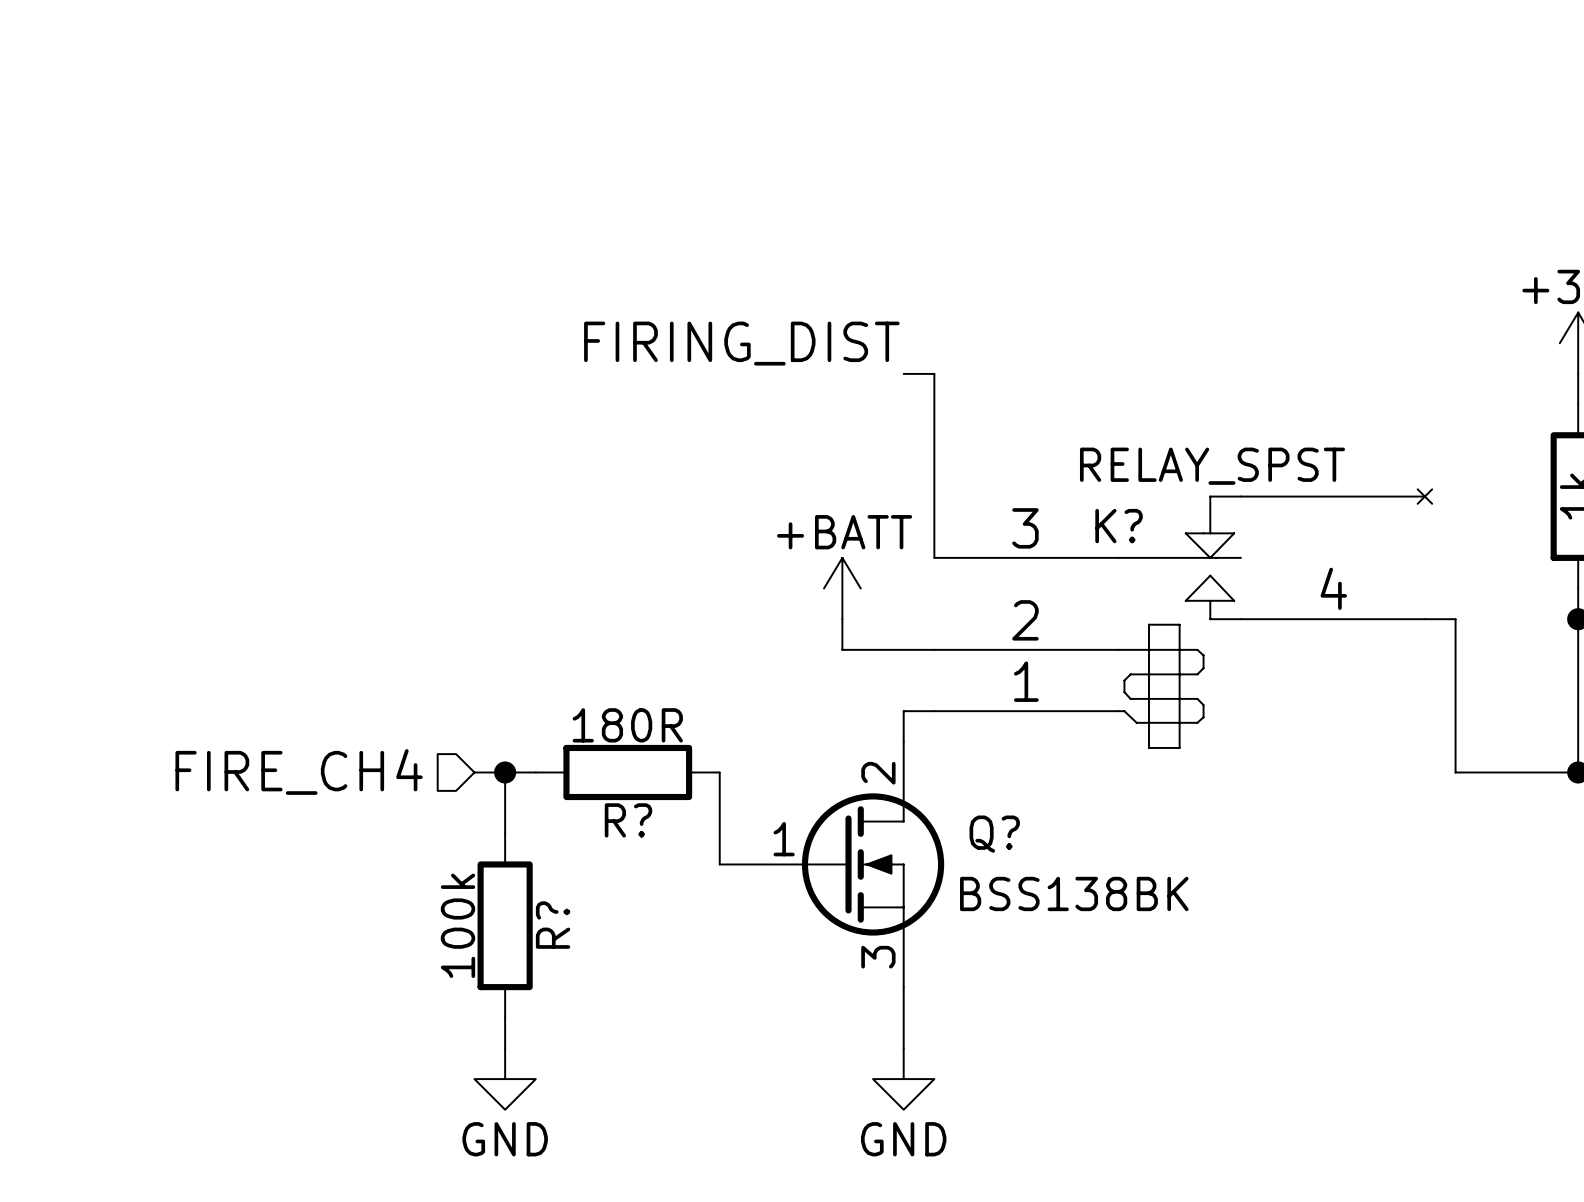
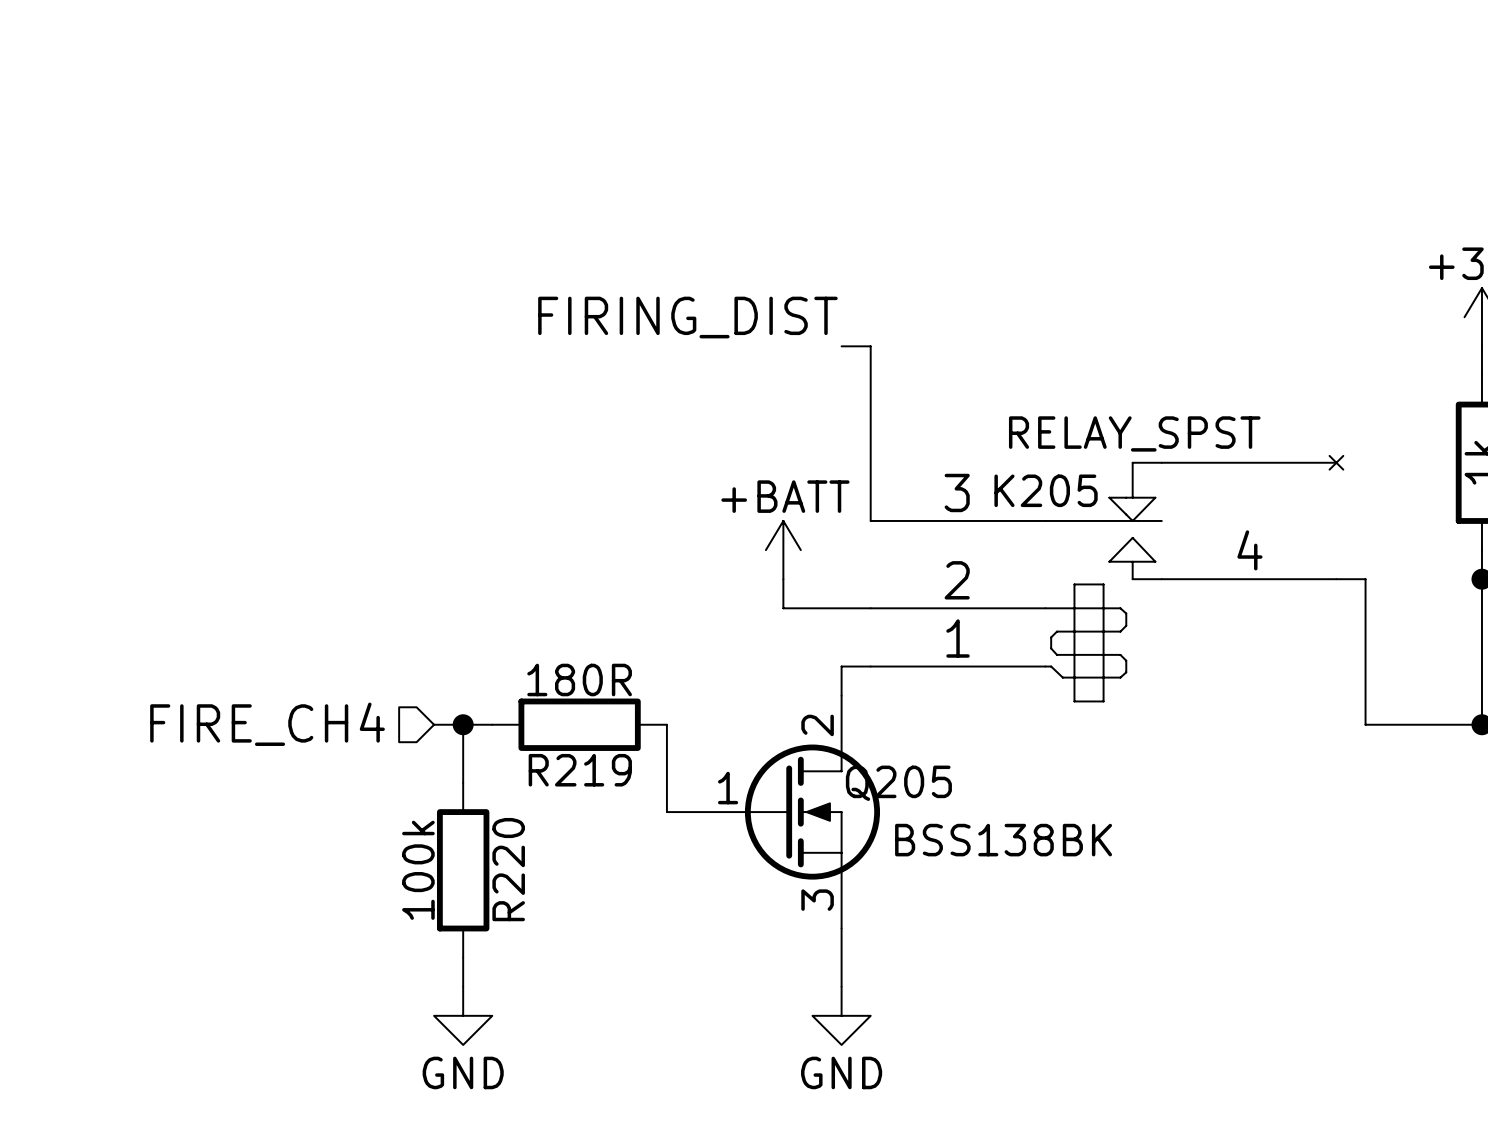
K? name: K? (1119, 526) -> K205 (1046, 490)
R? name: R? (628, 820) -> R219 (580, 770)
Q? name: Q? (994, 834) -> Q205 (898, 783)
R? name: R? (553, 925) -> R220 (508, 869)

